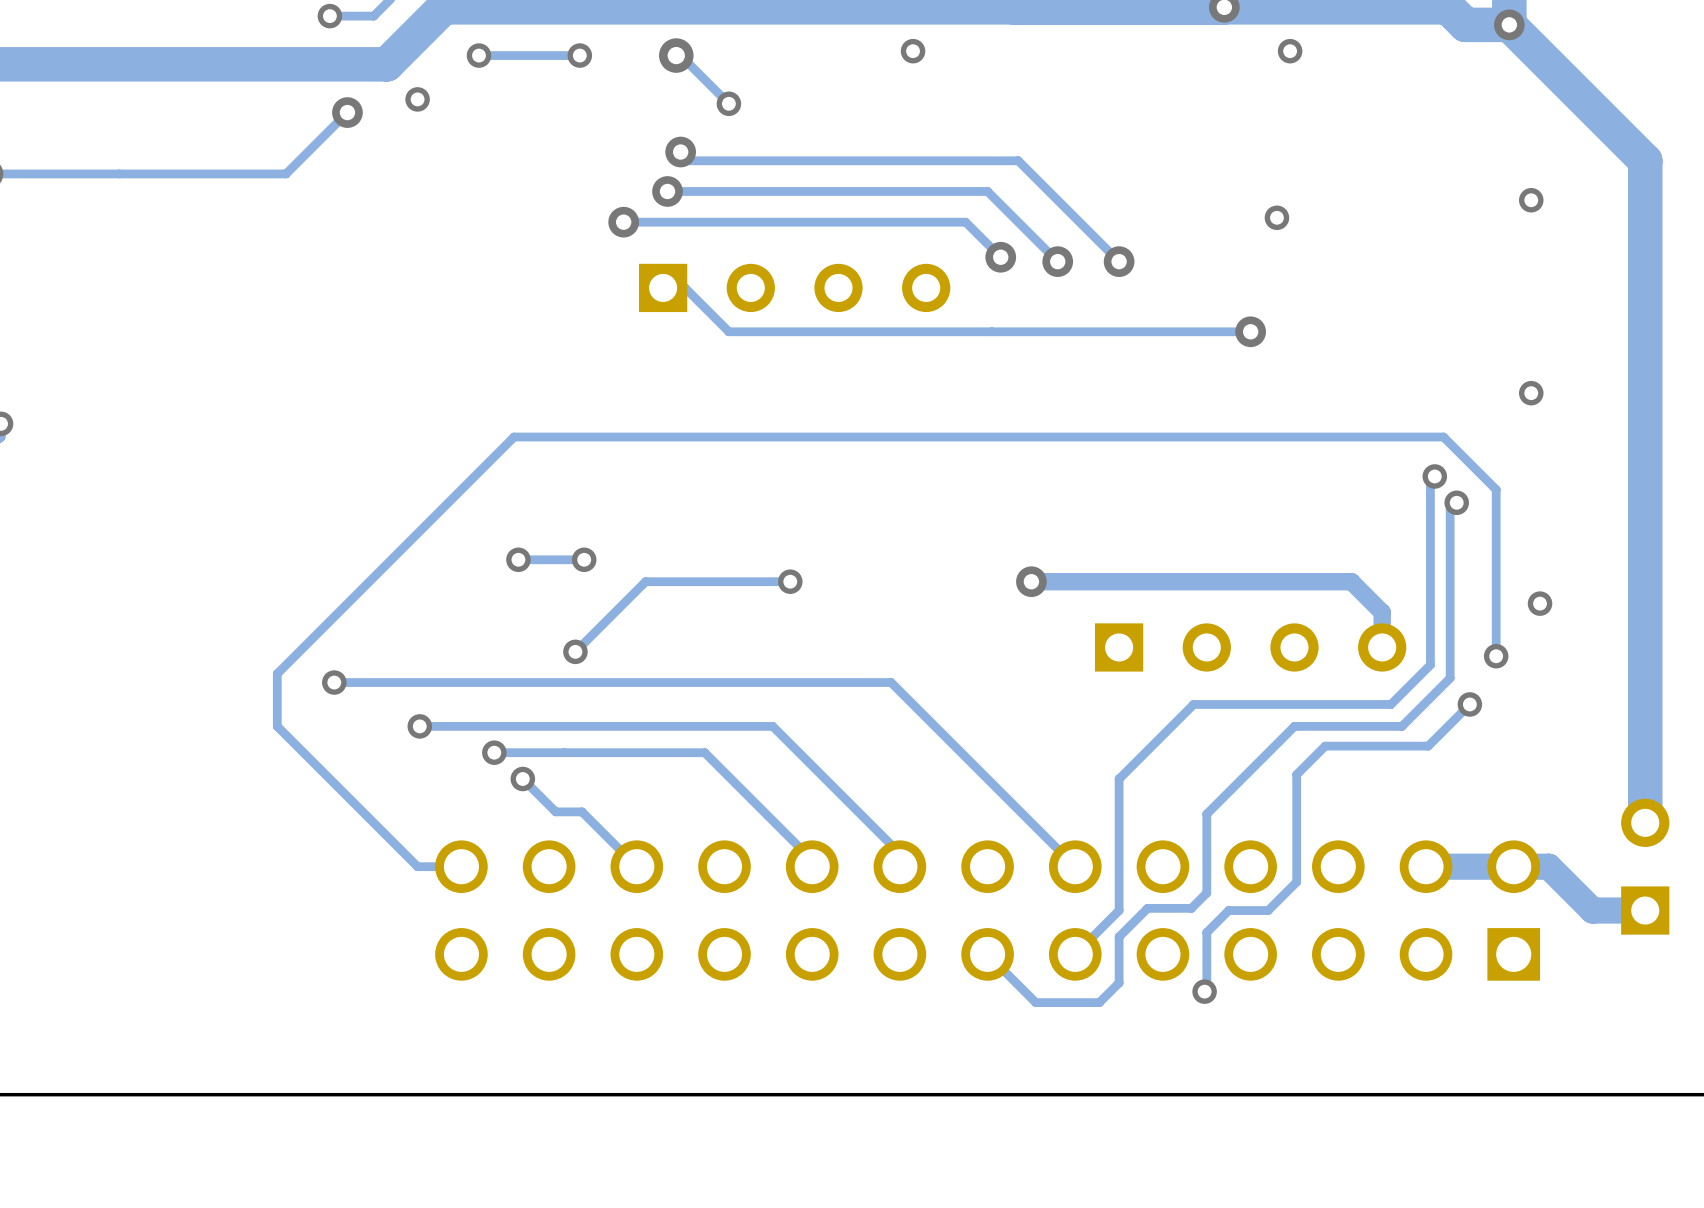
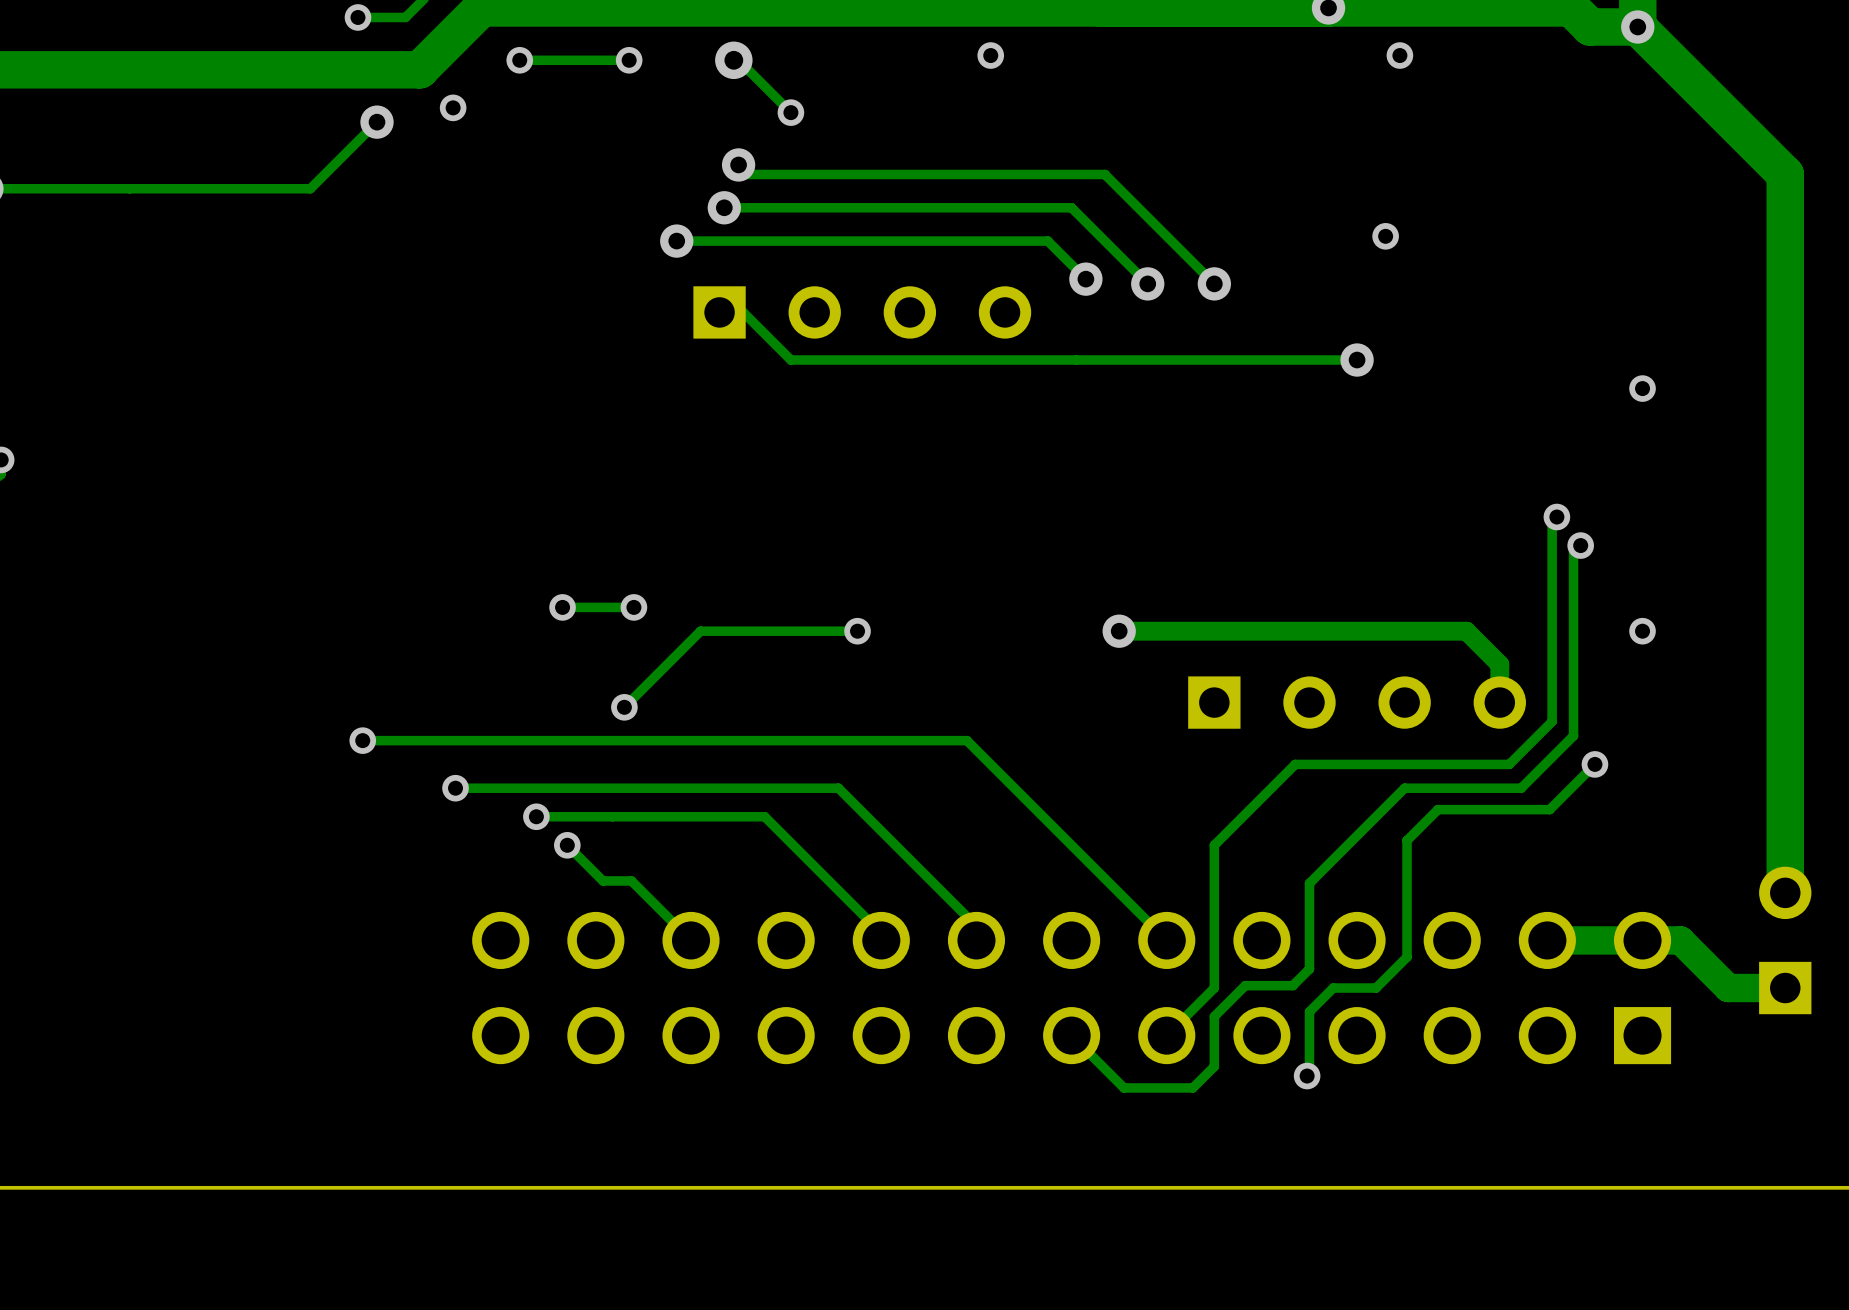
via: (1531, 200) -> none
via position: (1531, 393) -> (1642, 388)
via position: (1540, 603) -> (1642, 631)
track: (1496, 656) (1496, 489) (1443, 437) (514, 437) (277, 673) (277, 726) (417, 866) (461, 866) -> none
via: (1496, 656) -> none

